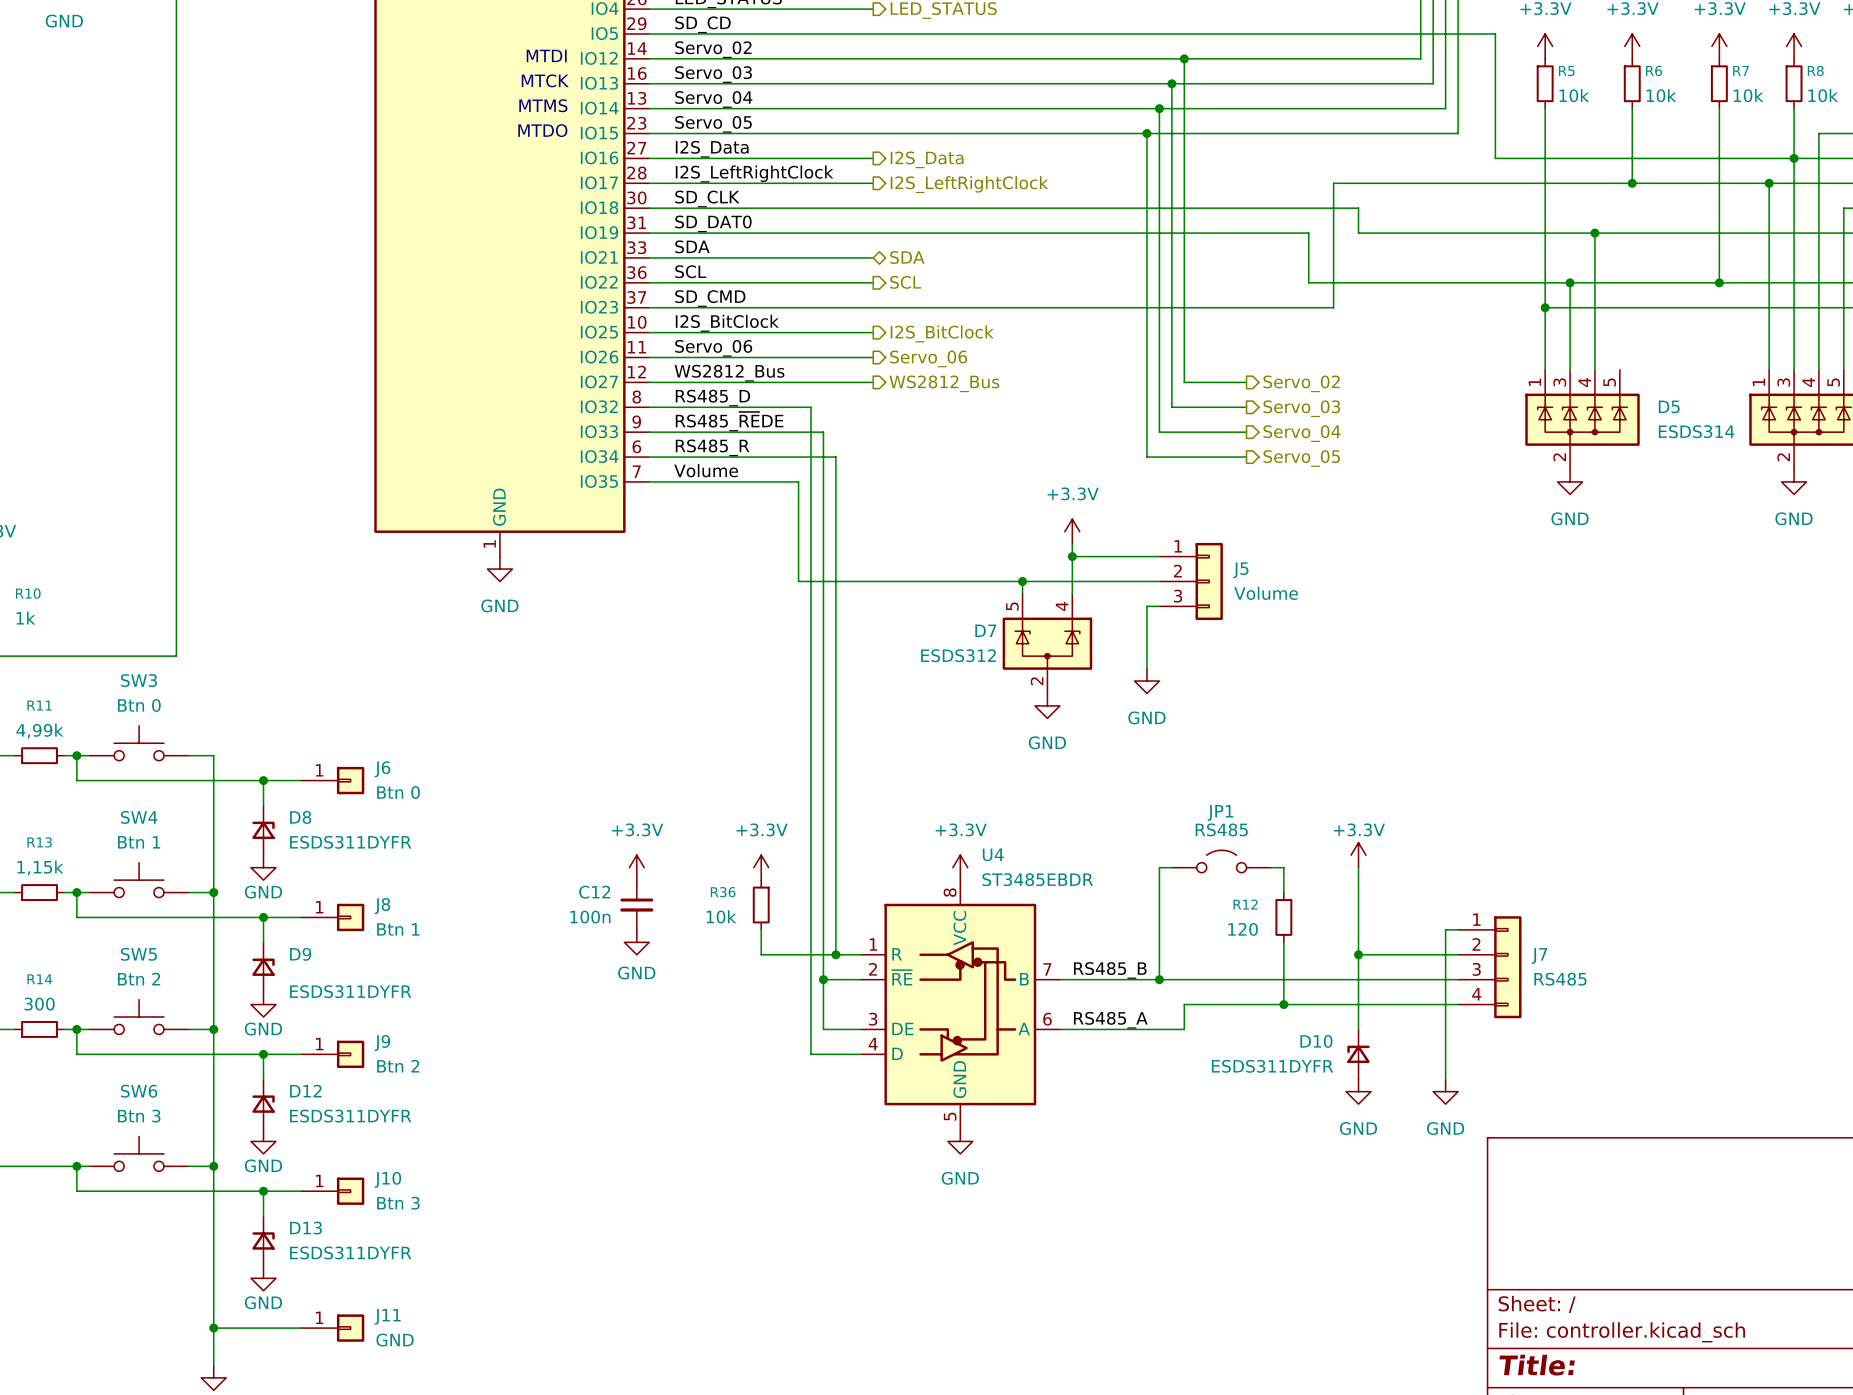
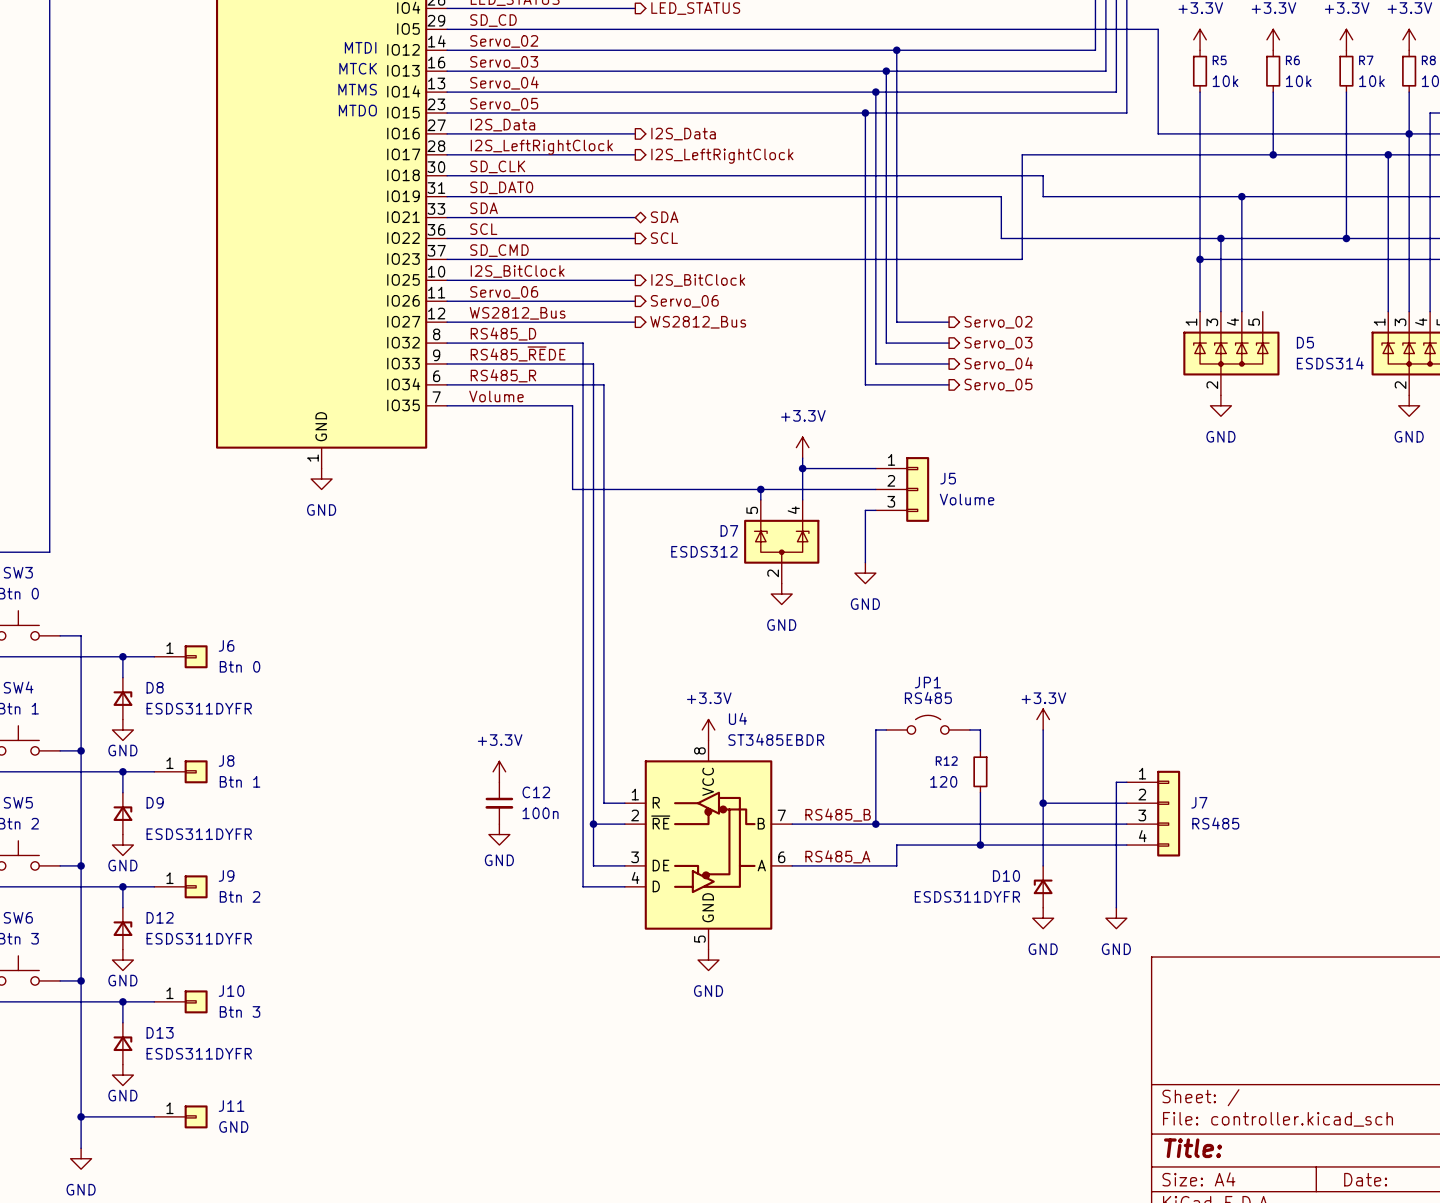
power symbol: +3.3V (636, 867) -> none
power symbol: +3.3V (761, 867) -> none
C12 name position: C12 (594, 892) -> C12 (536, 792)
C12 position: (636, 905) -> (499, 803)
R36: 10k (761, 905) -> none
C12 value position: 100n (590, 917) -> 100n (540, 813)
power symbol: none -> +3.3V (499, 771)
wire: (761, 929) (761, 954) (835, 954) -> none
power symbol position: GND (636, 942) -> GND (499, 834)
junction: (835, 954) -> none

